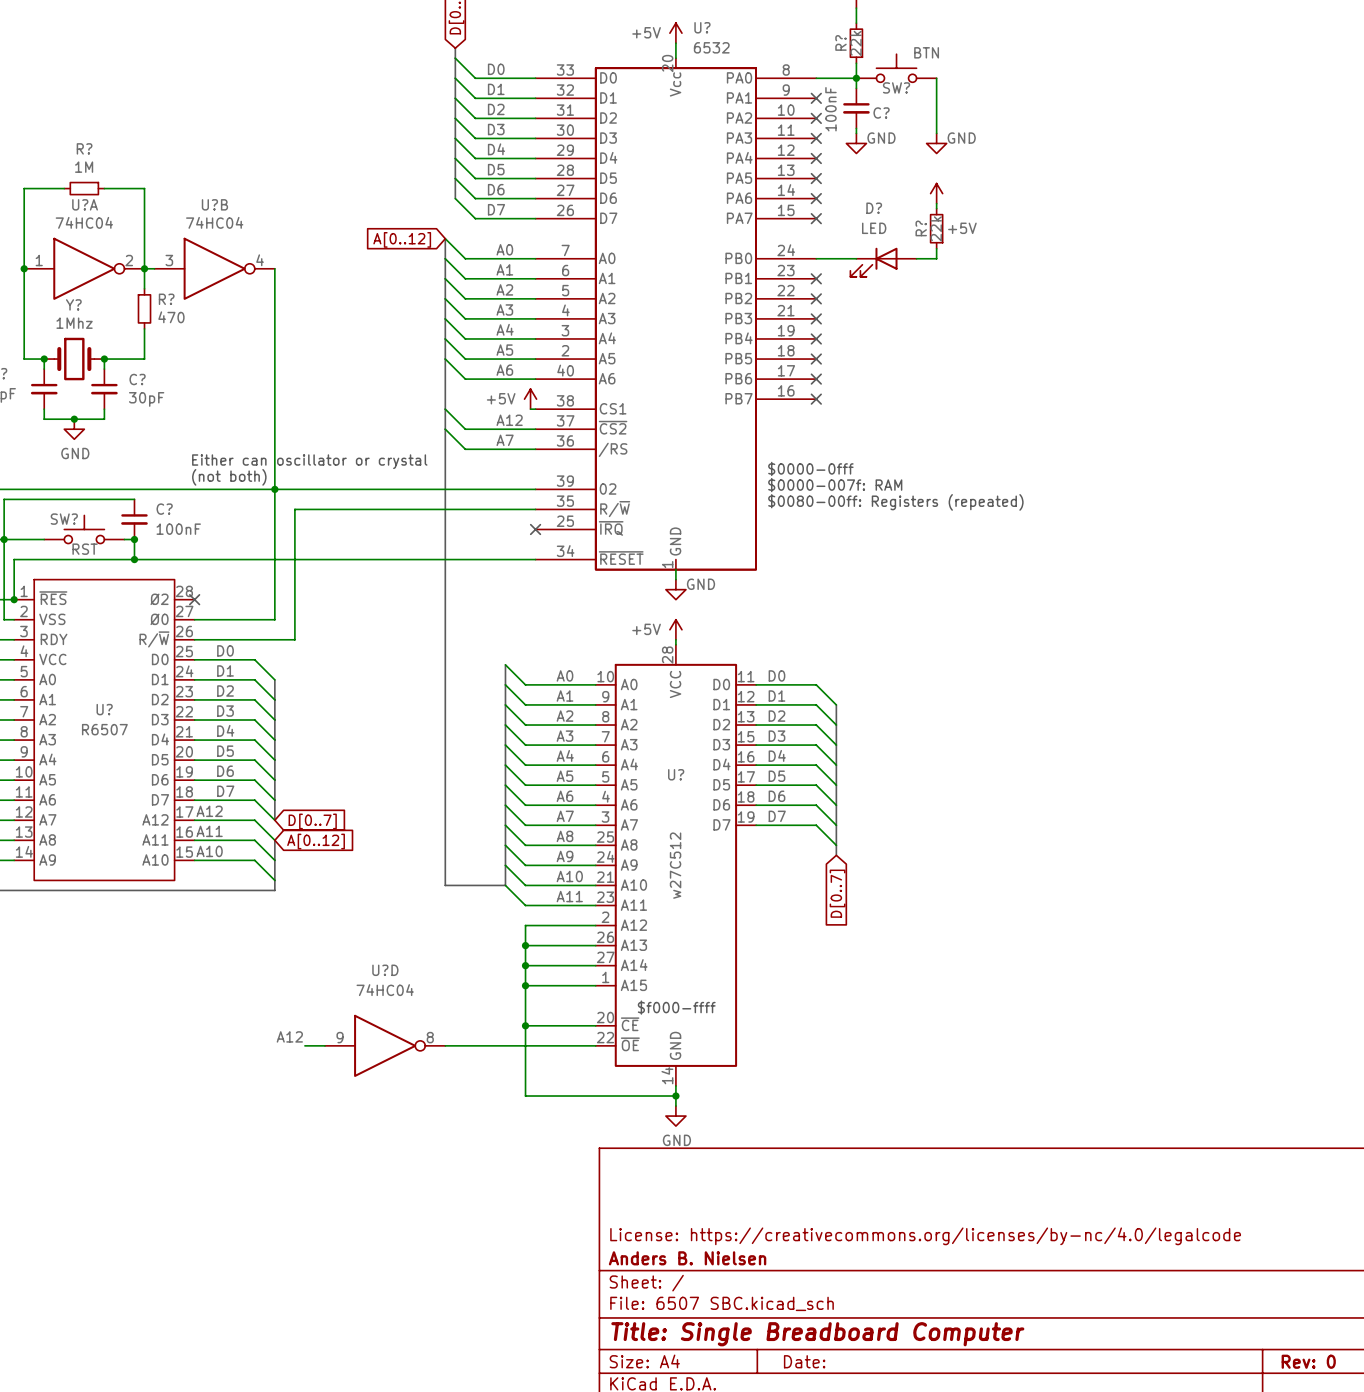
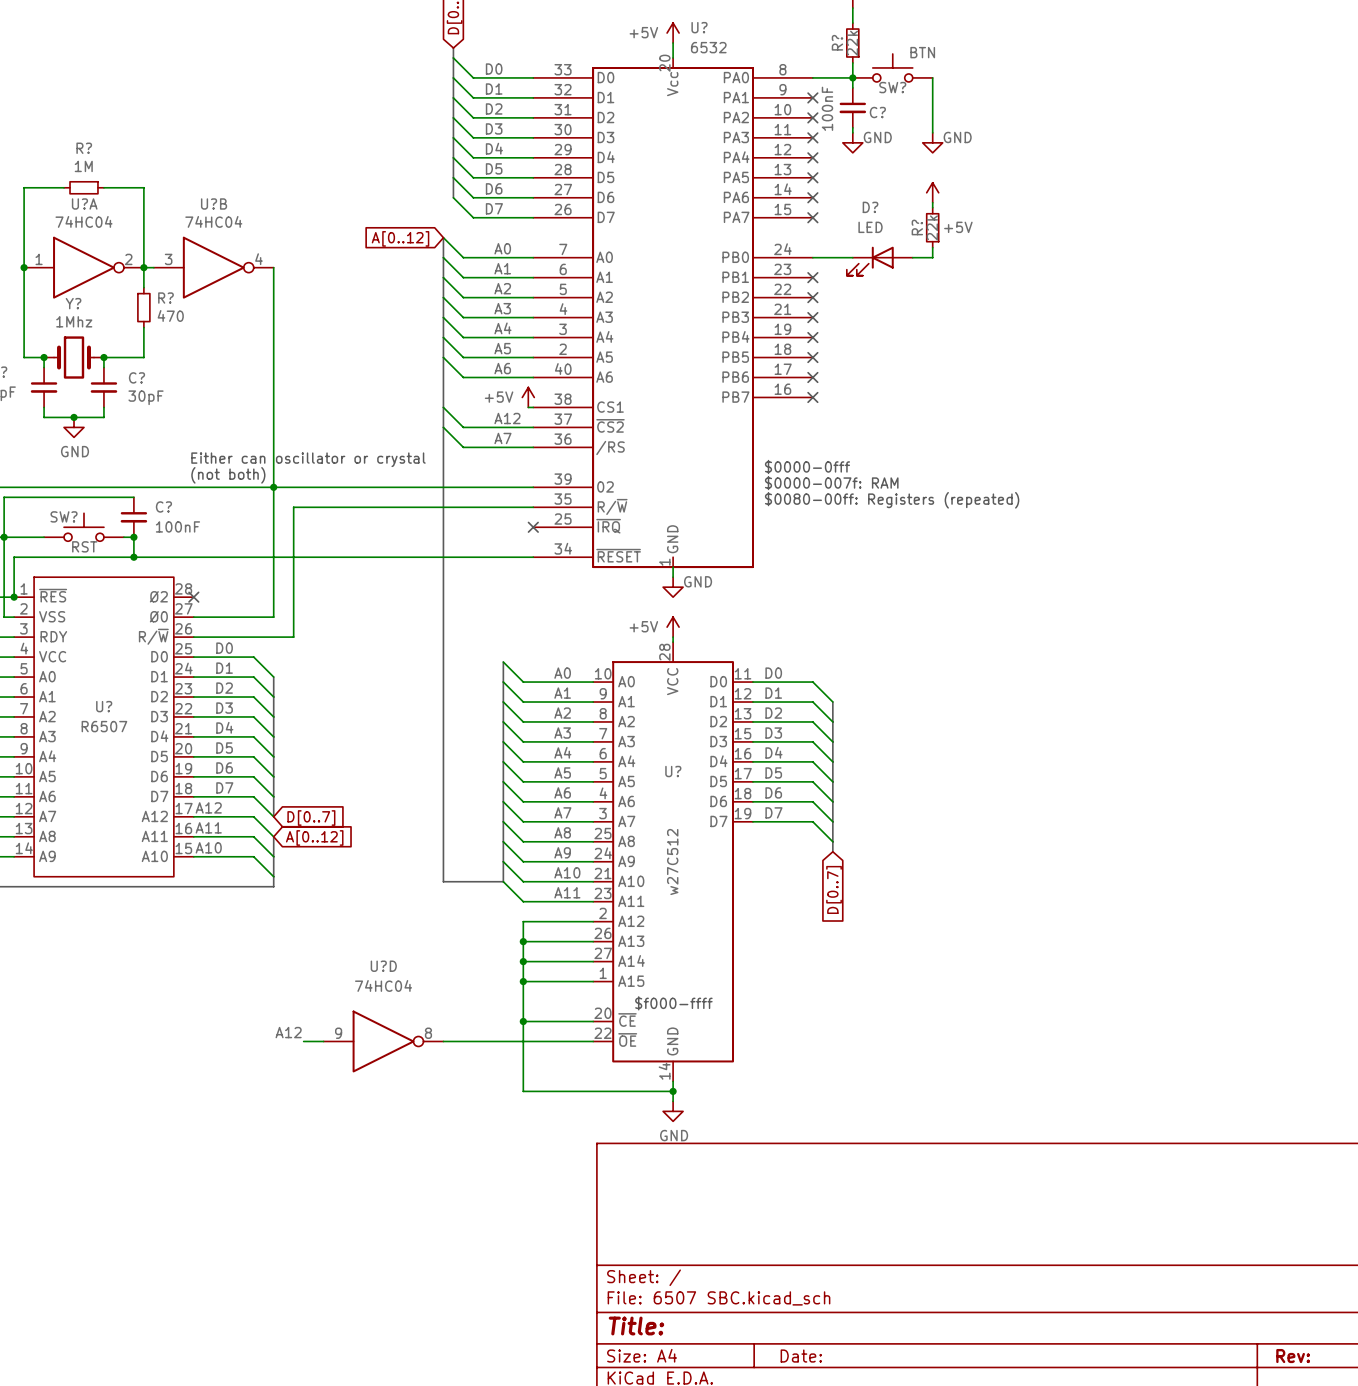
title block: License: https://creativecommons.org/licenses/by-nc/4.0/legalcode (925, 1236) -> none
title block: Anders B. Nielsen (687, 1258) -> none
title block: Title: Single Breadboard Computer (817, 1334) -> Title: (636, 1326)
title block: Rev: 0 (1308, 1361) -> Rev: (1293, 1356)

